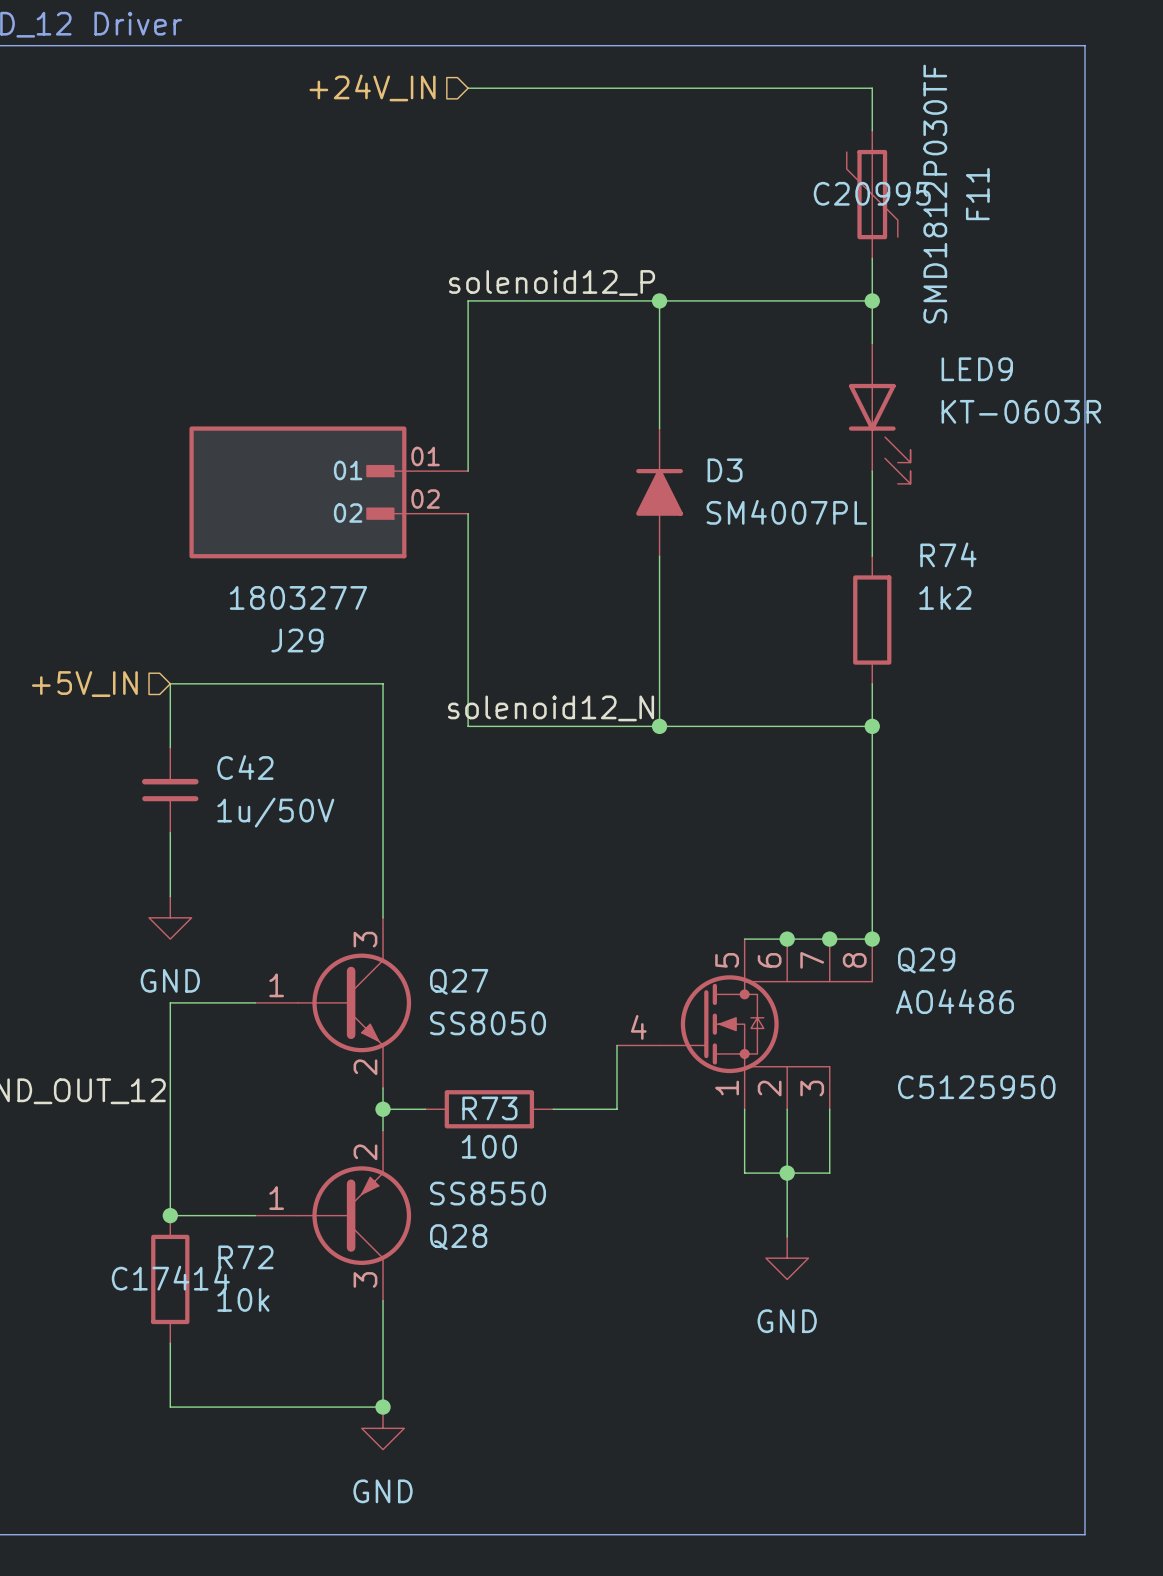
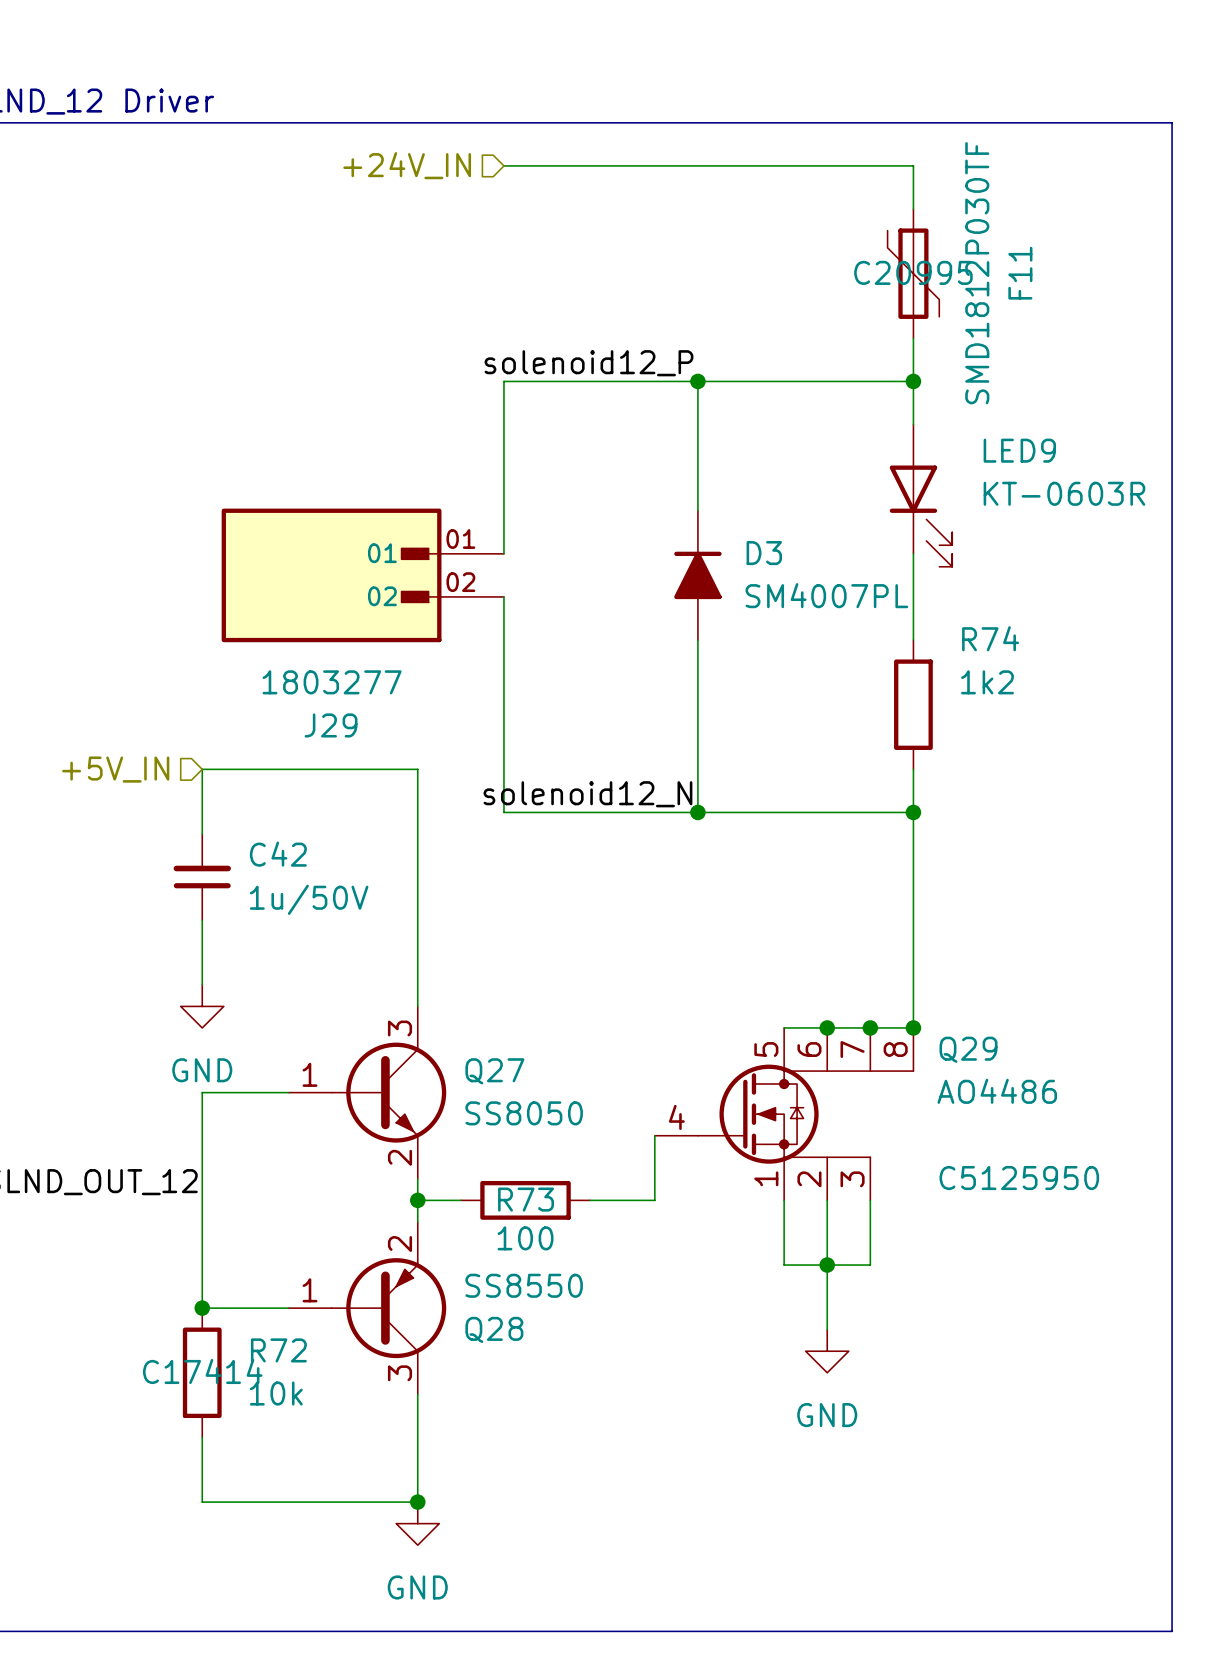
line: (1084, 45) (1084, 1534) -> (1128, 122) (1172, 122) (1172, 1631) (1128, 1631)

